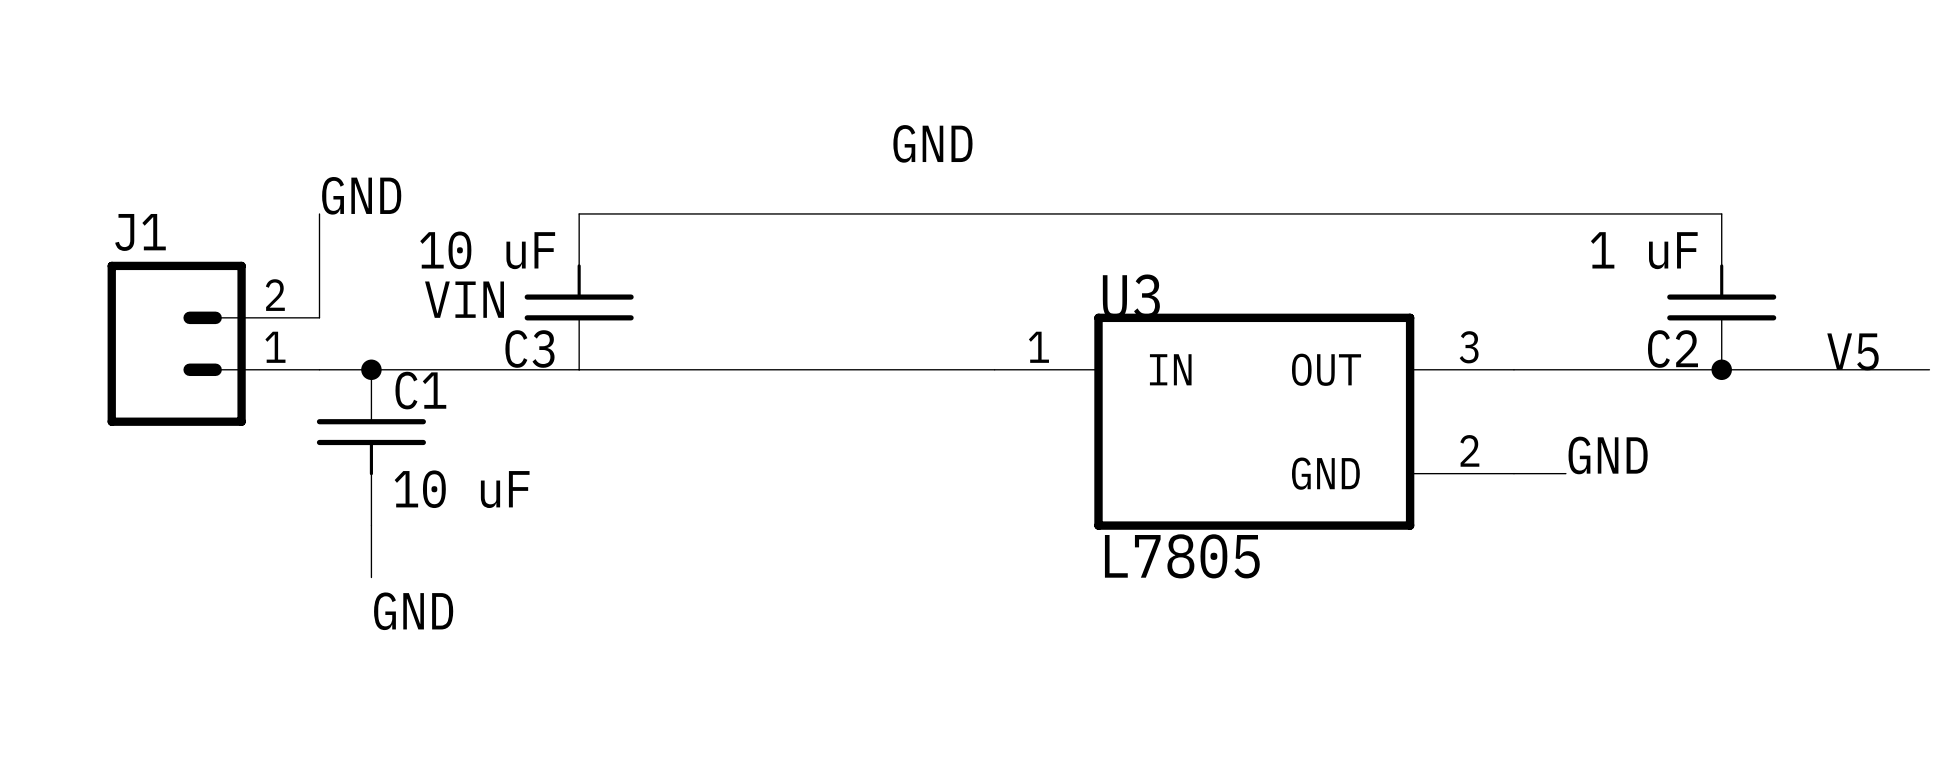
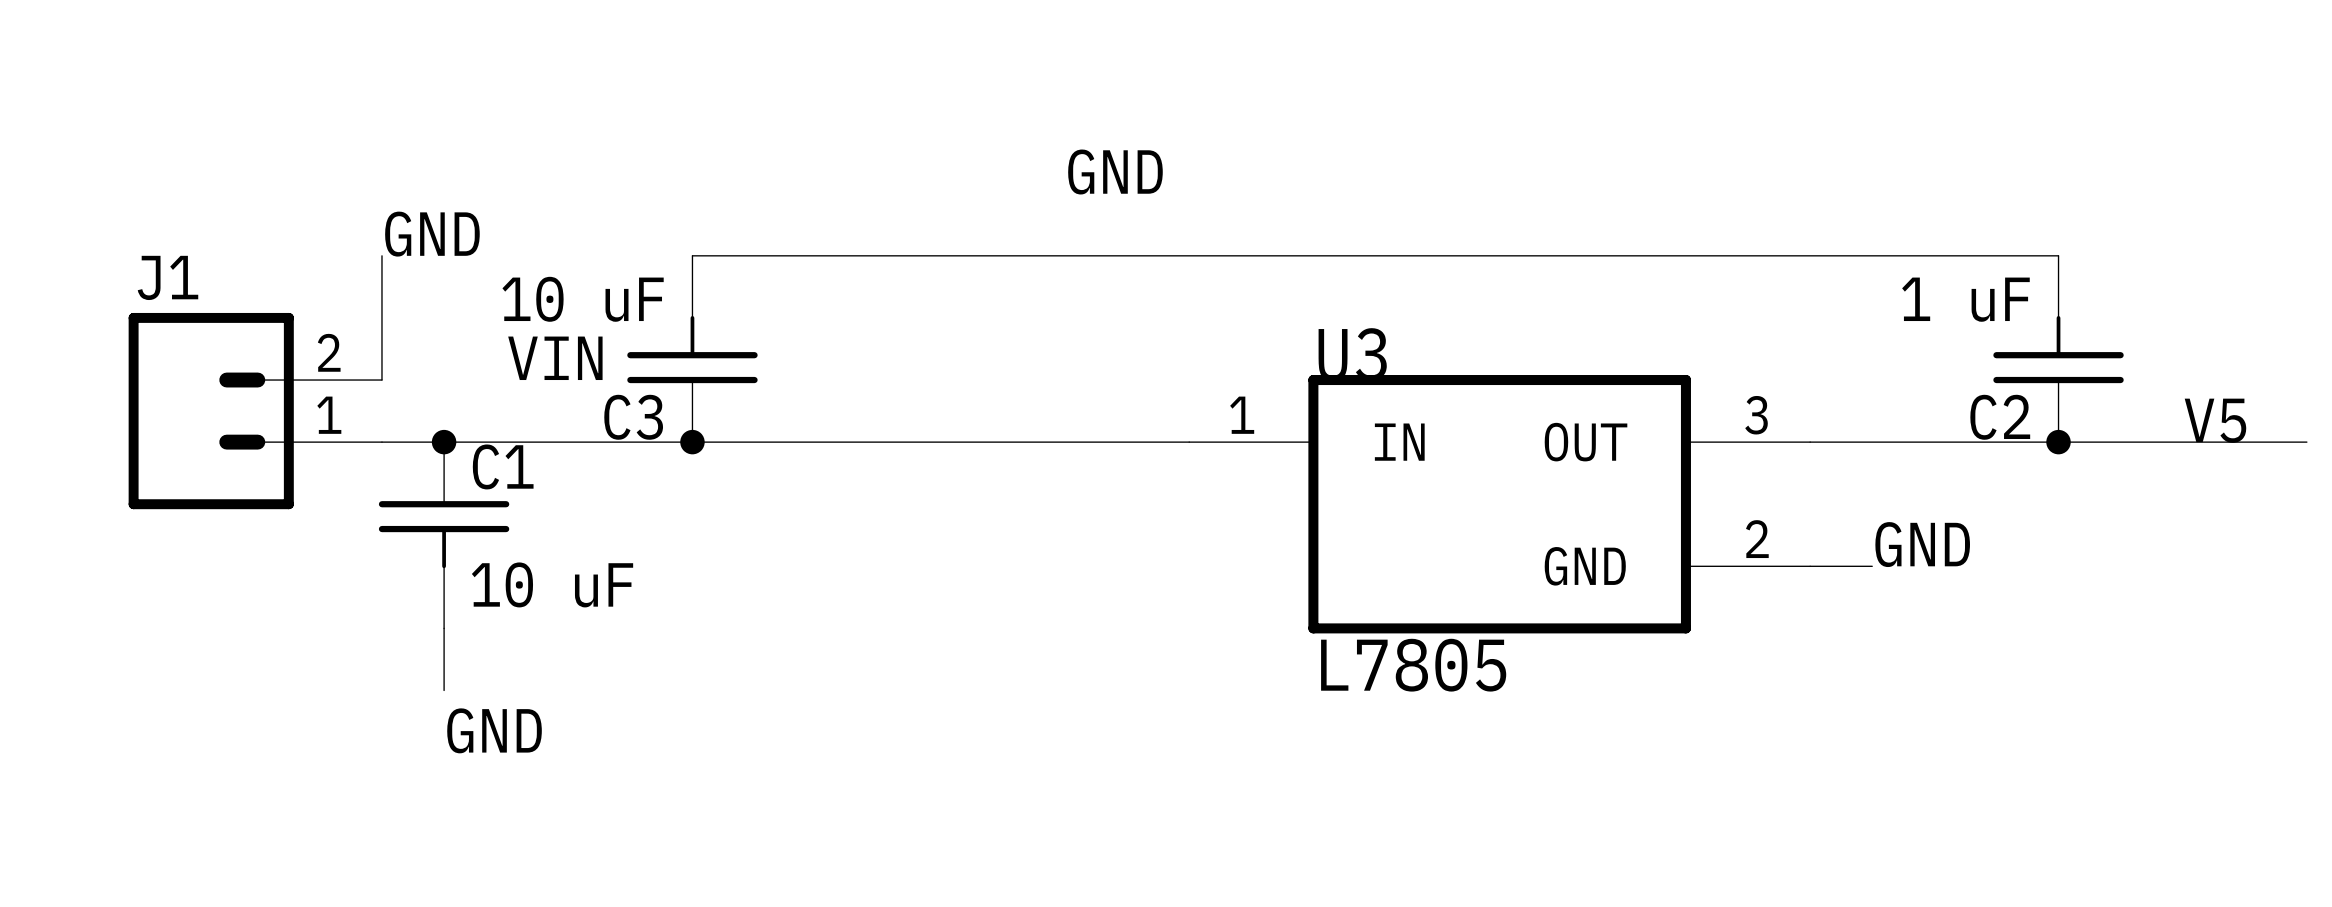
junction: none -> (692, 442)

